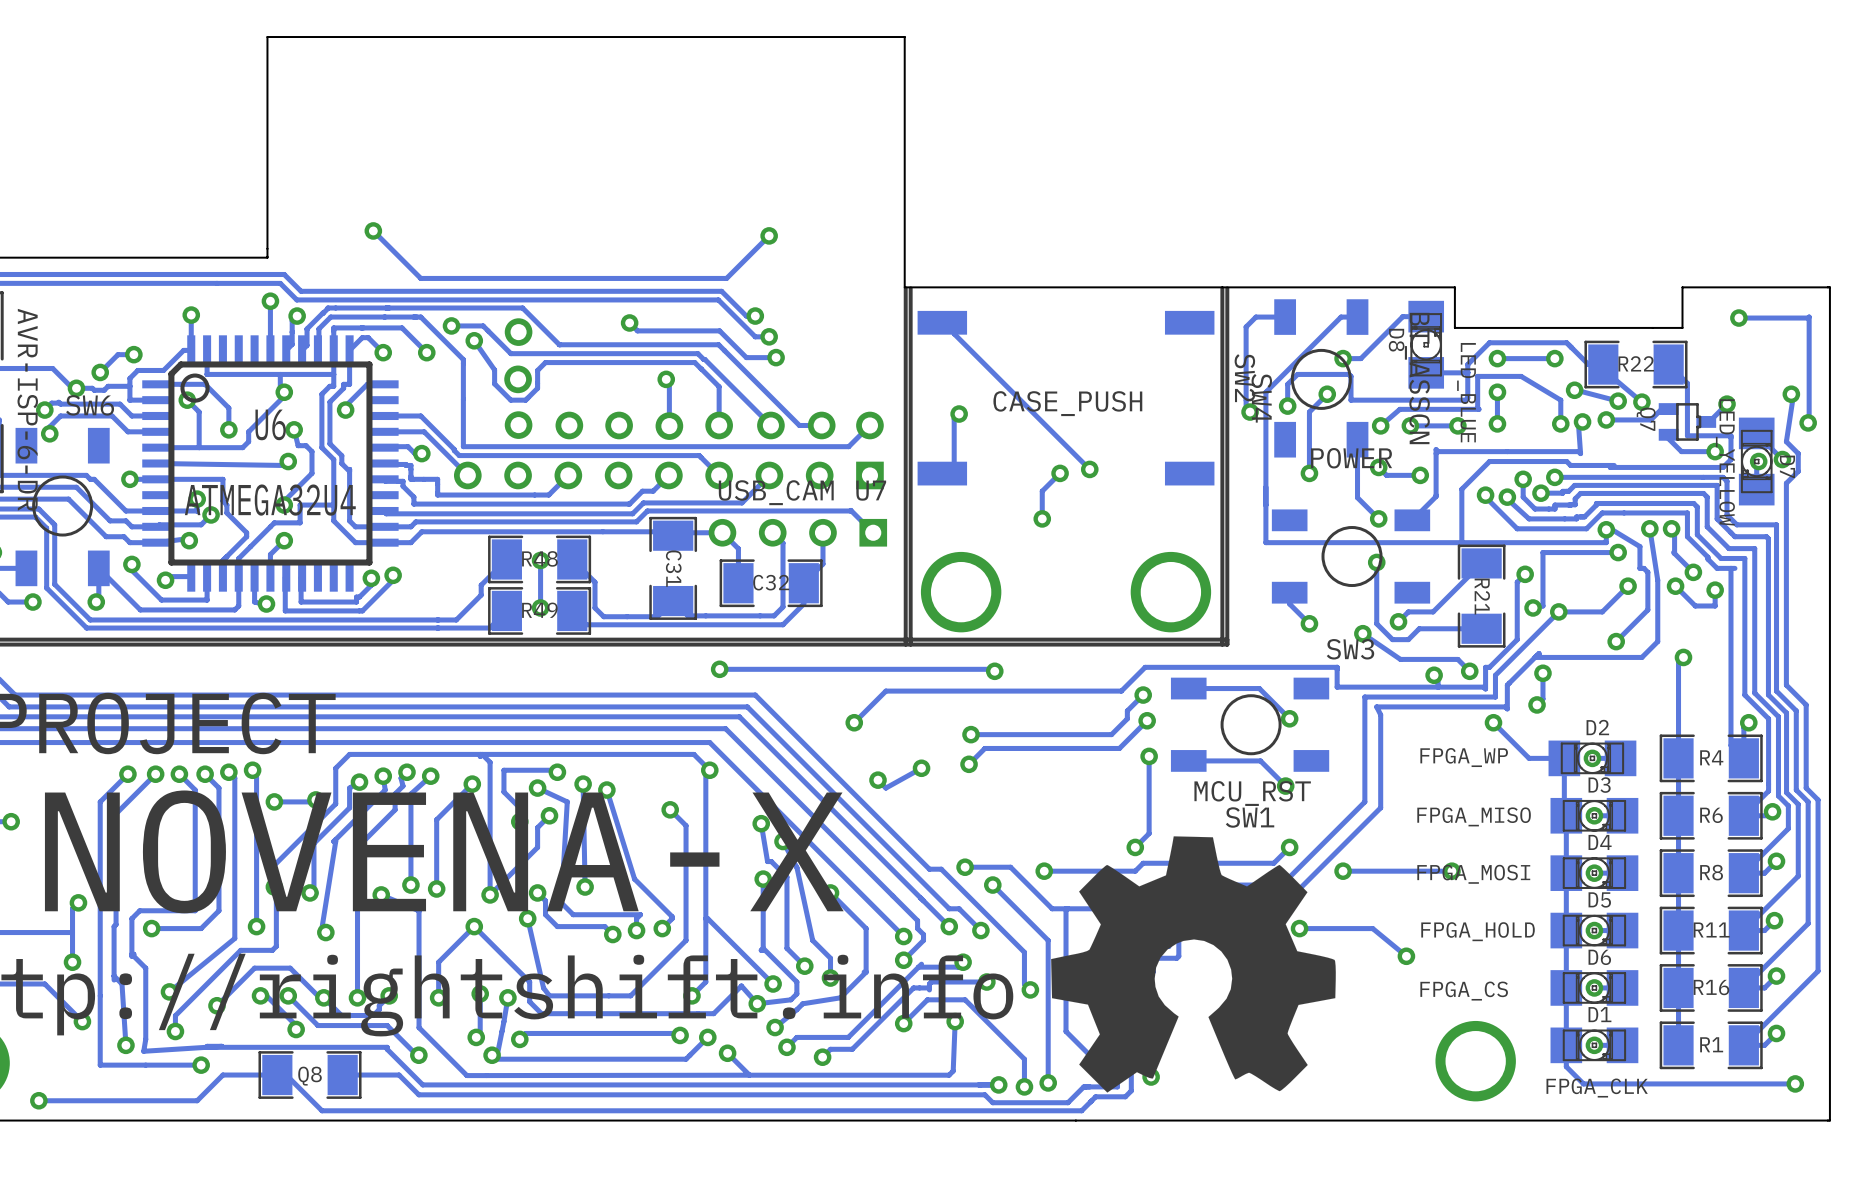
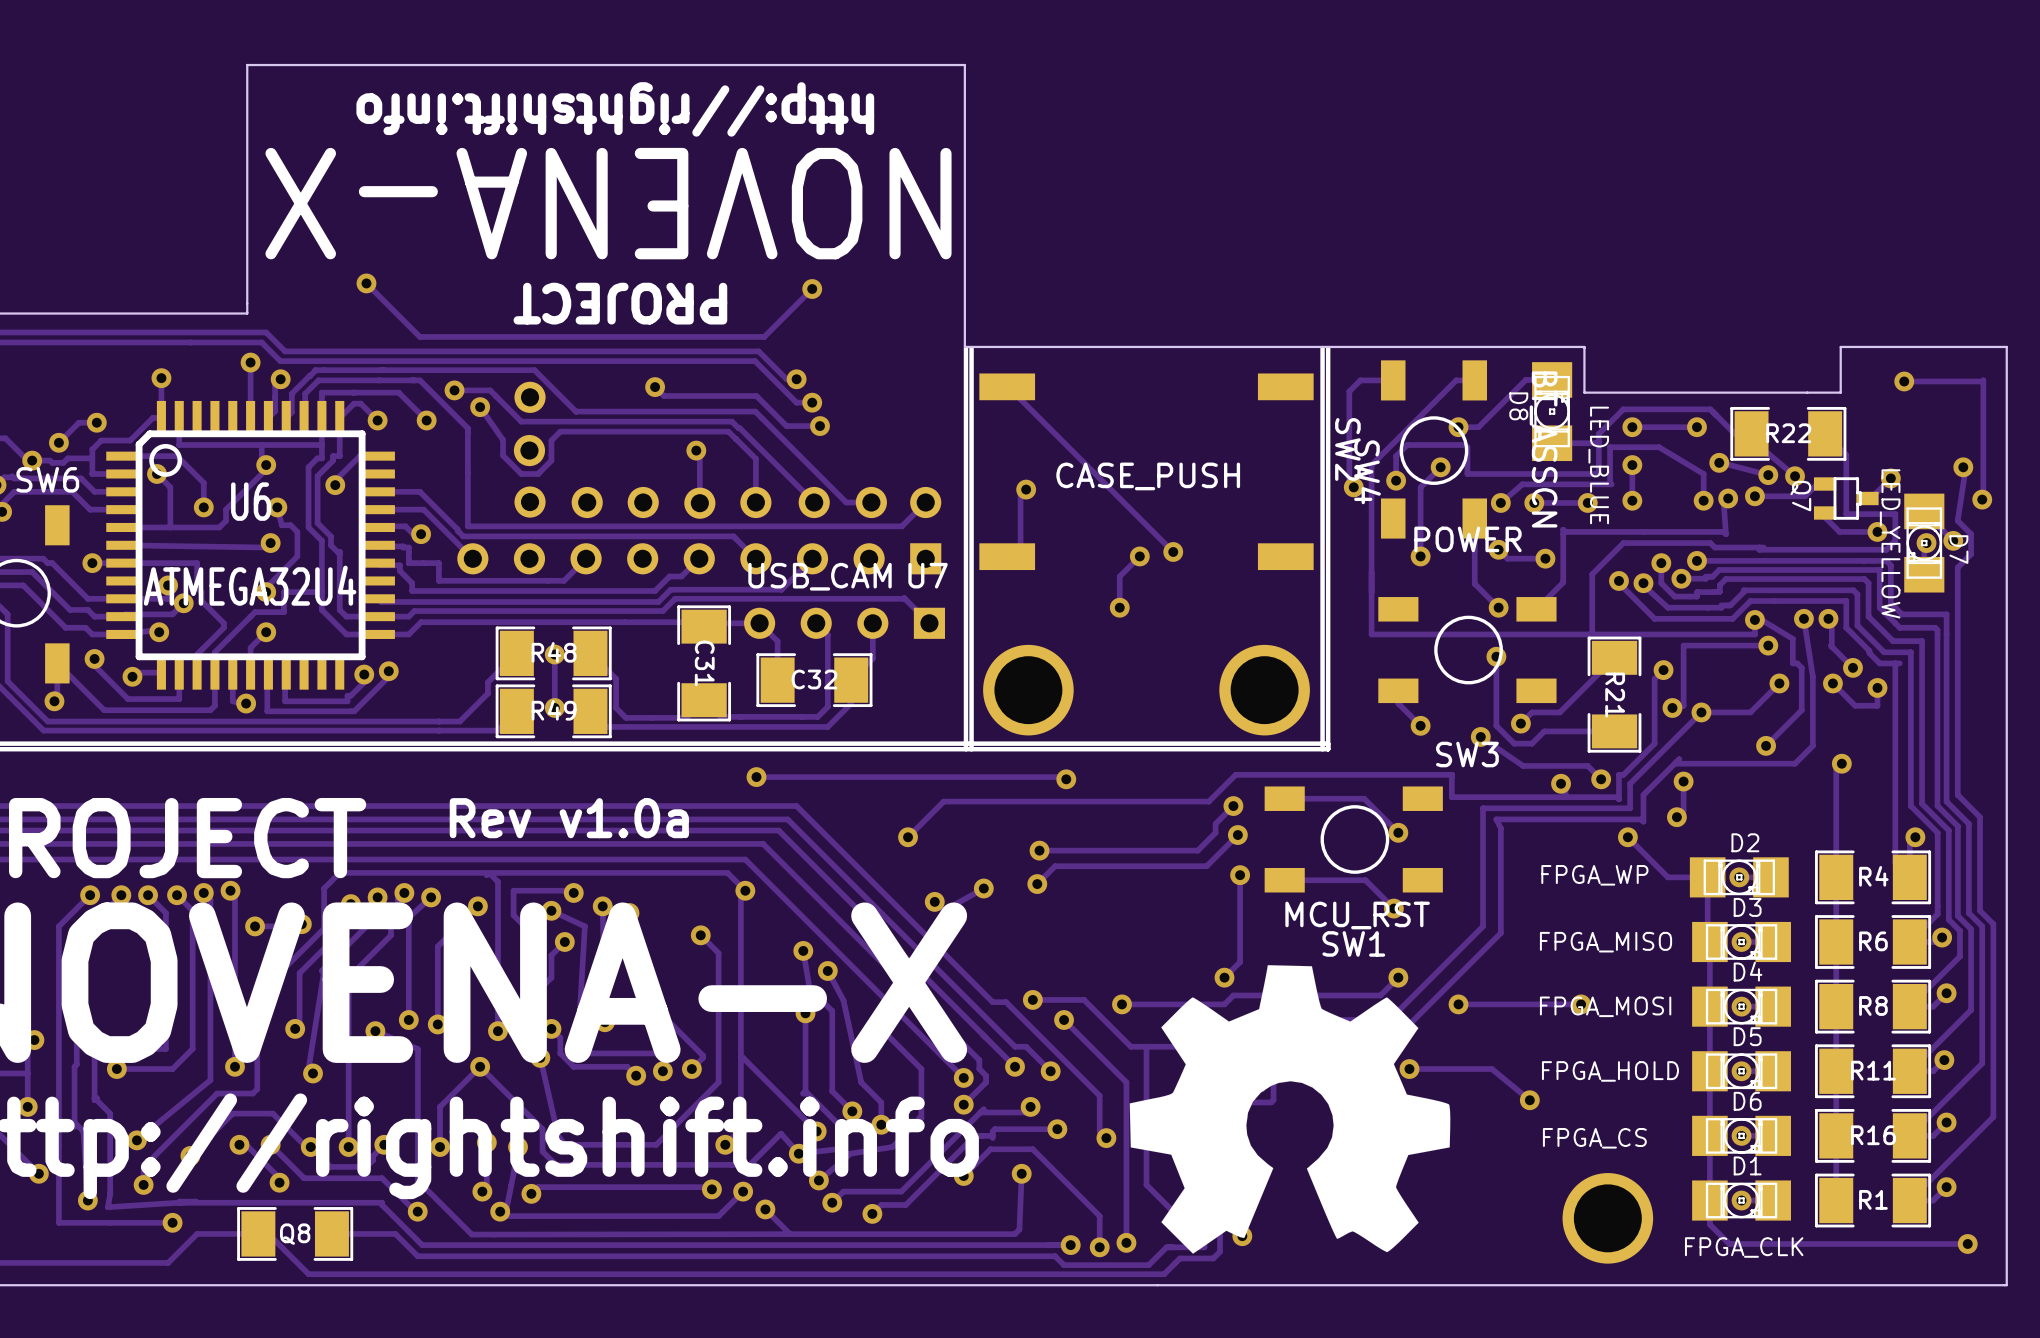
text: none -> http://rightshift.info (615, 109)
text: none -> NOVENA-X (608, 203)
text: none -> PROJECT (620, 303)
text: none -> Rev v1.0a (569, 818)

